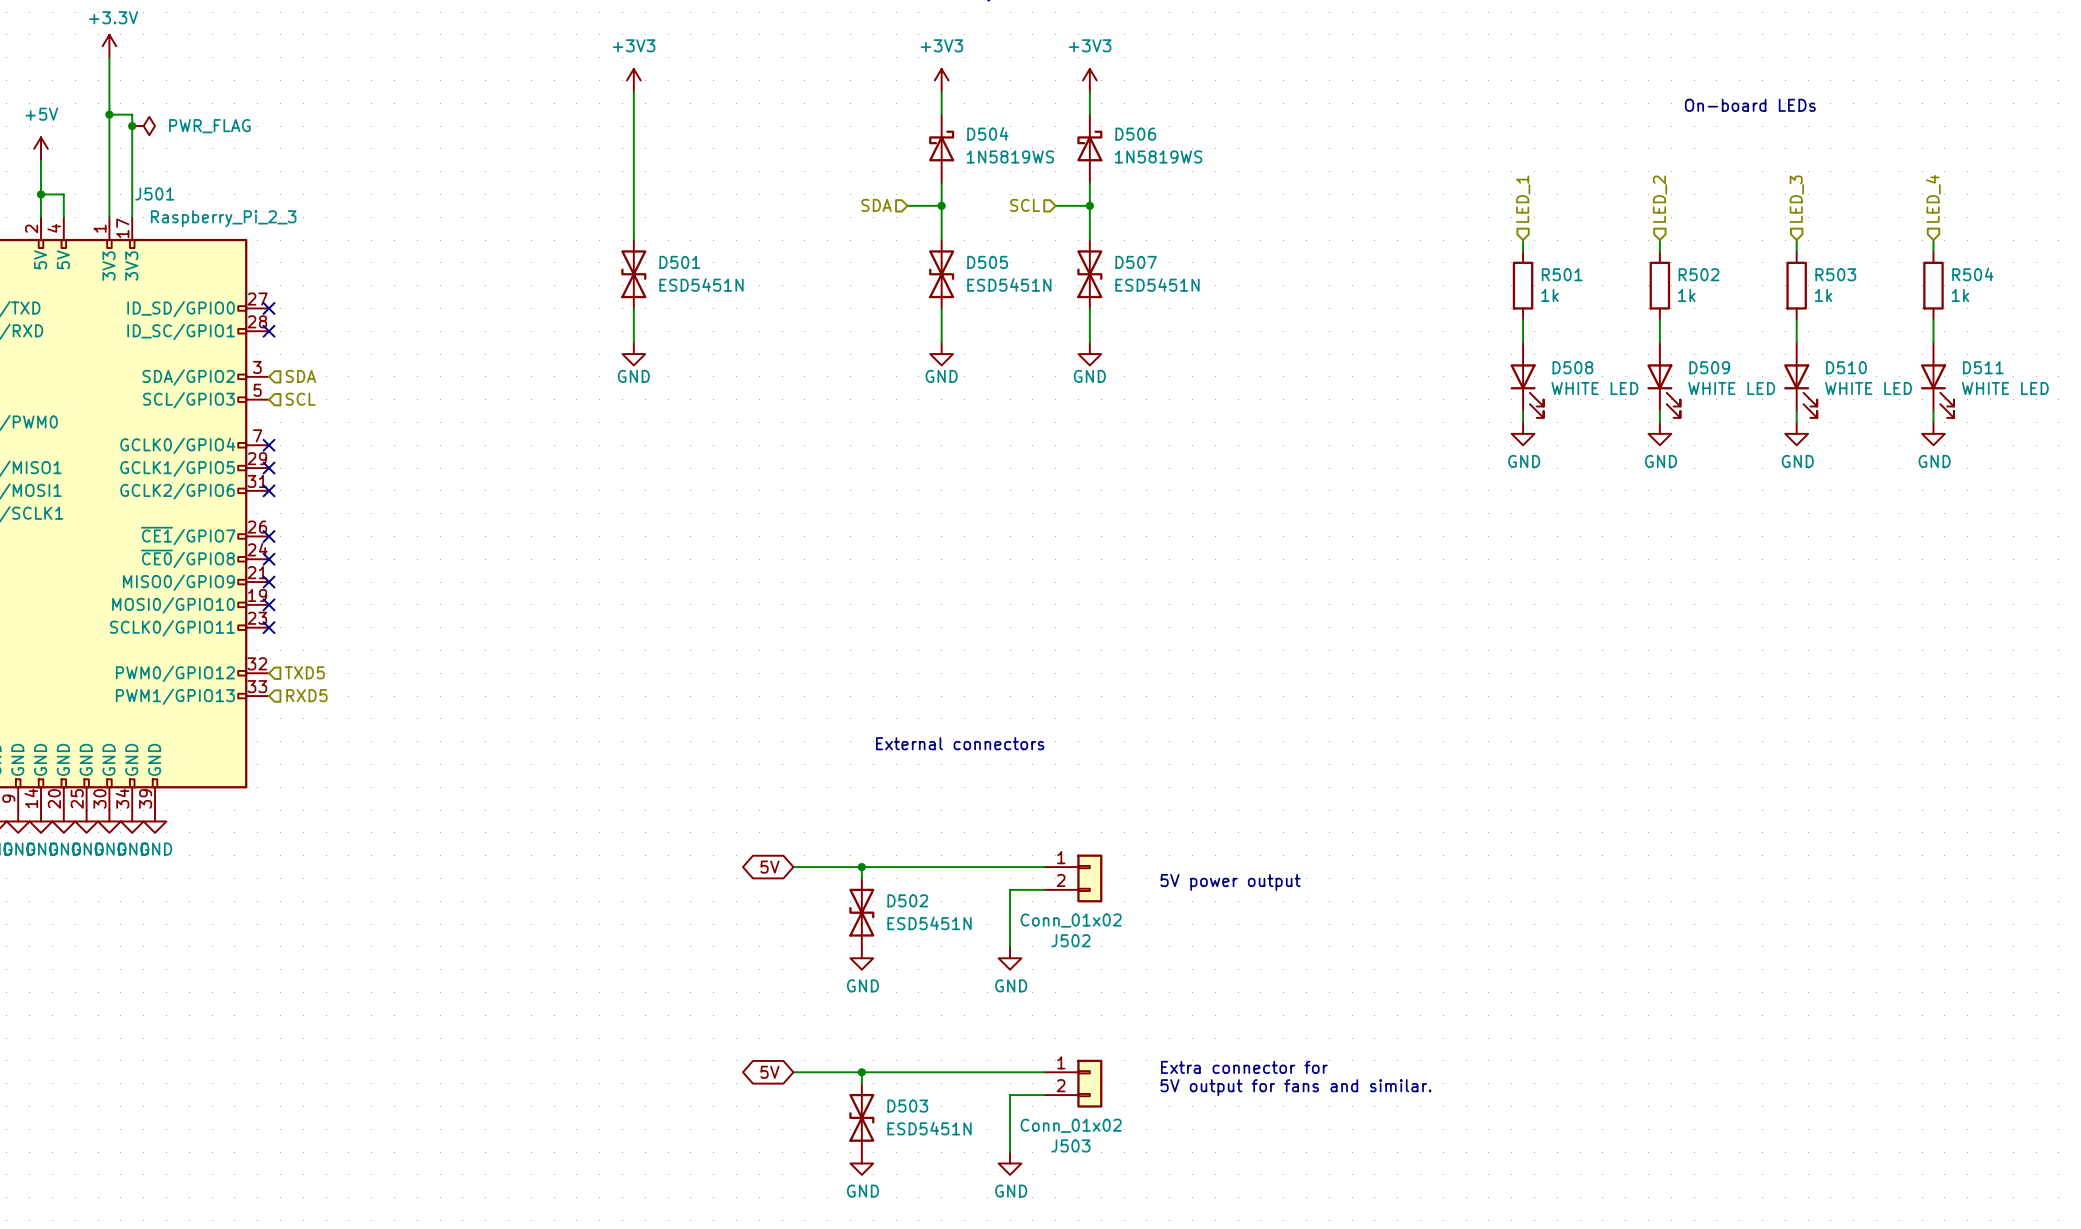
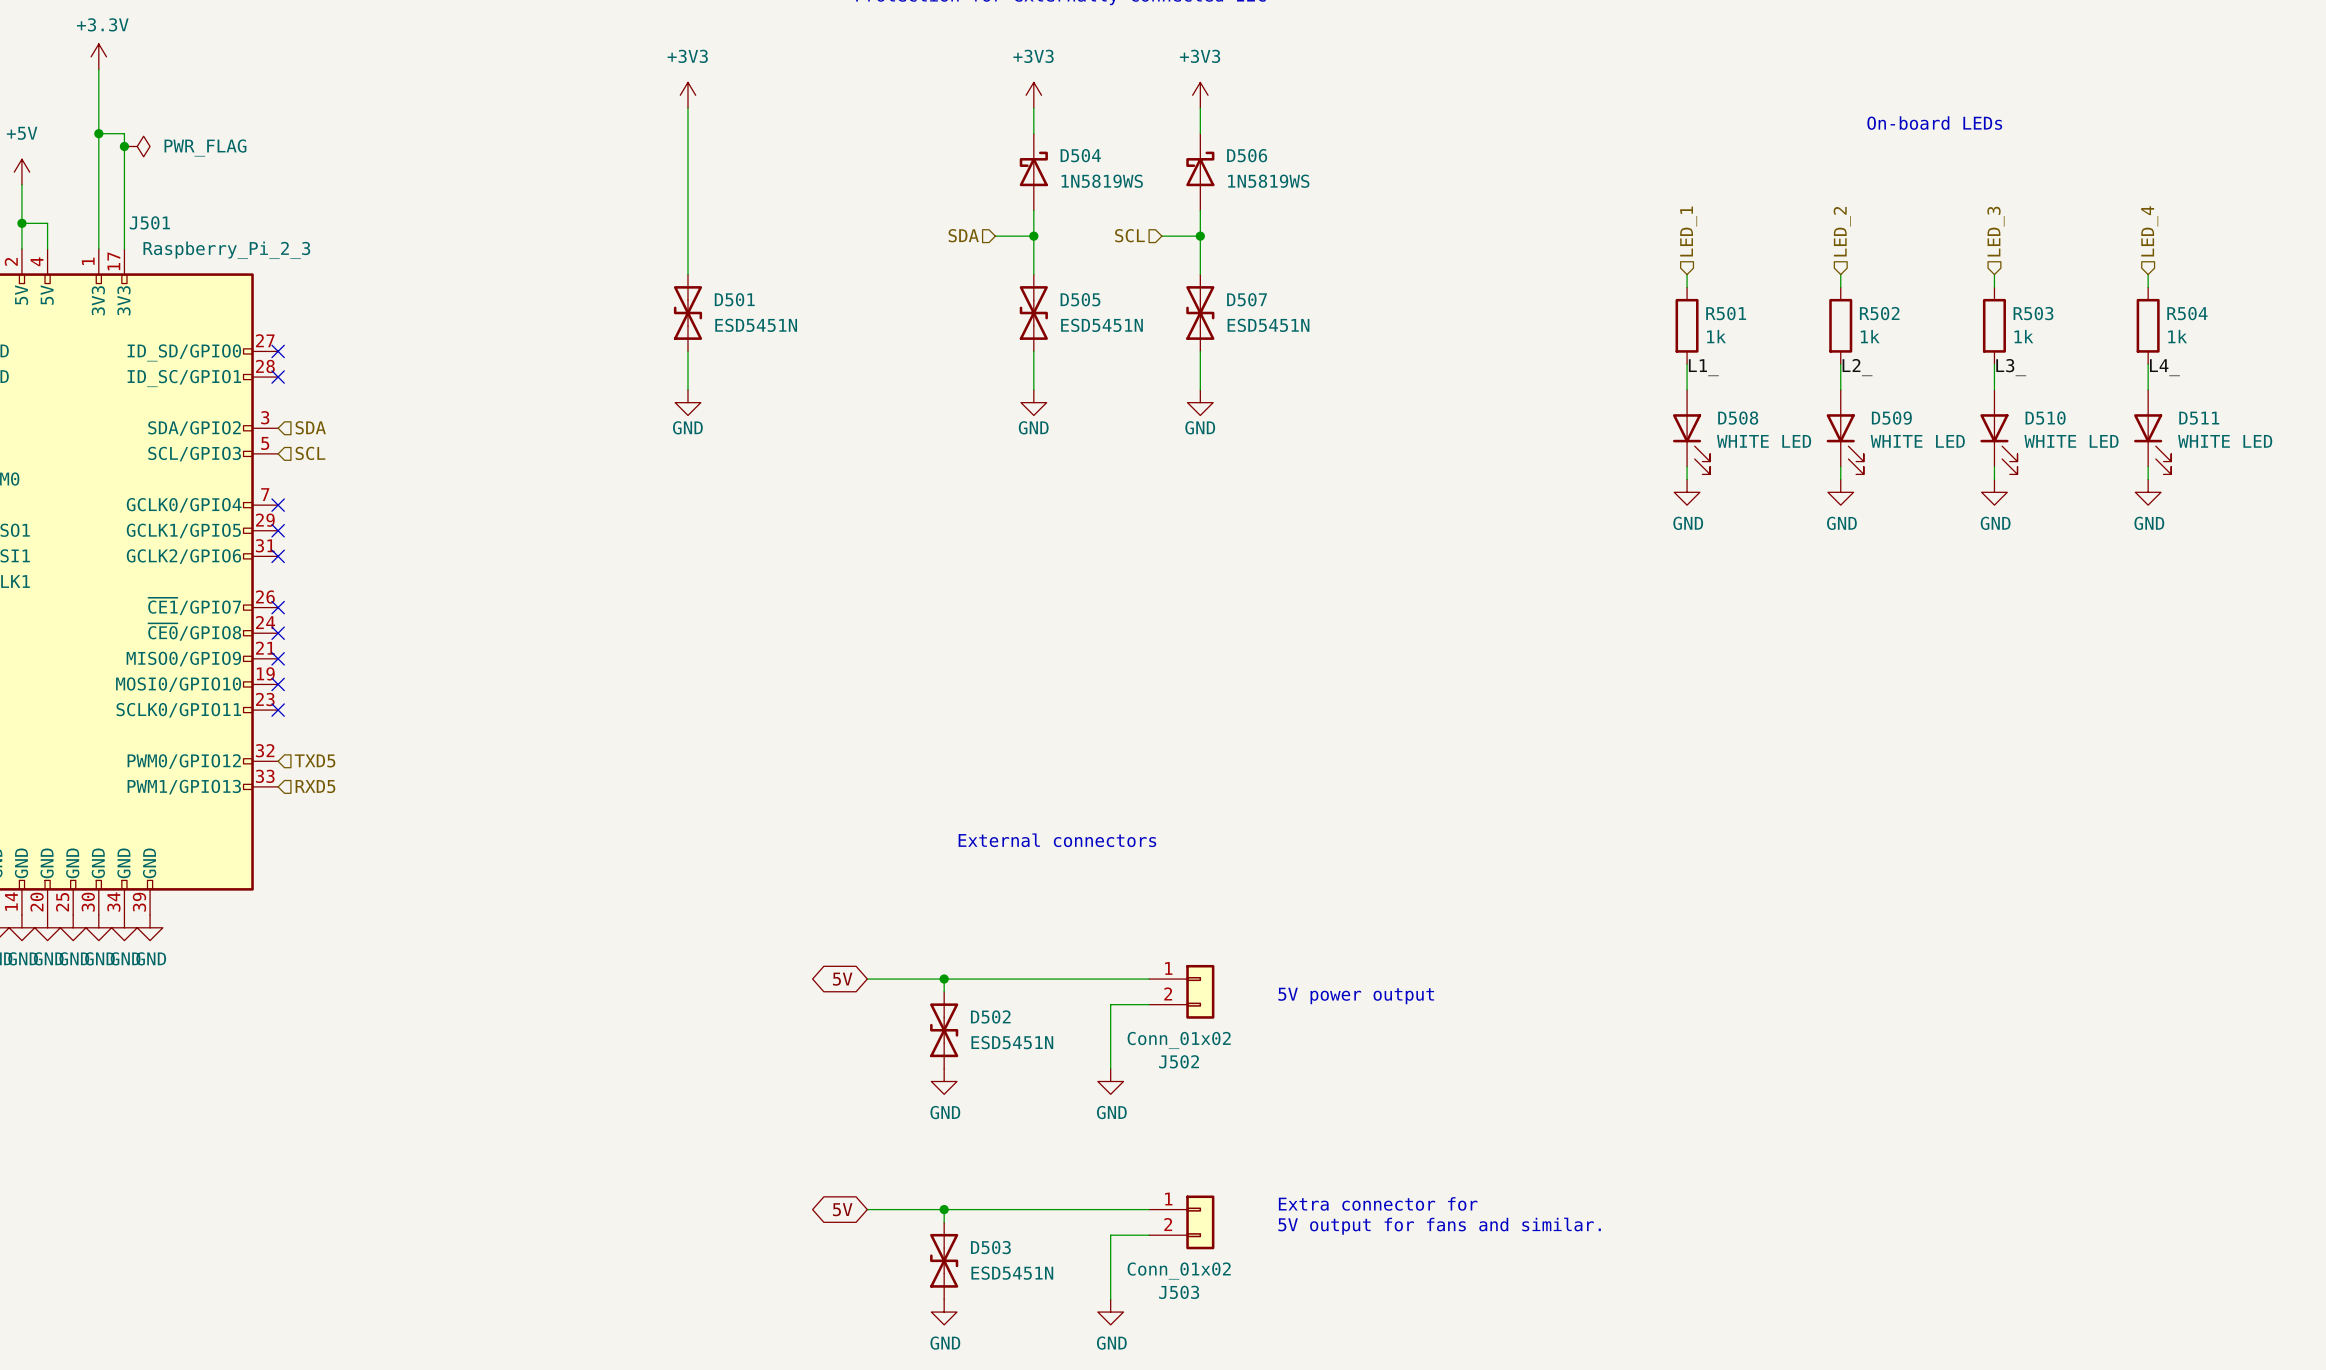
label: none -> L1_ (1703, 367)
label: none -> L2_ (1857, 367)
label: none -> L3_ (2011, 367)
label: none -> L4_ (2164, 367)

